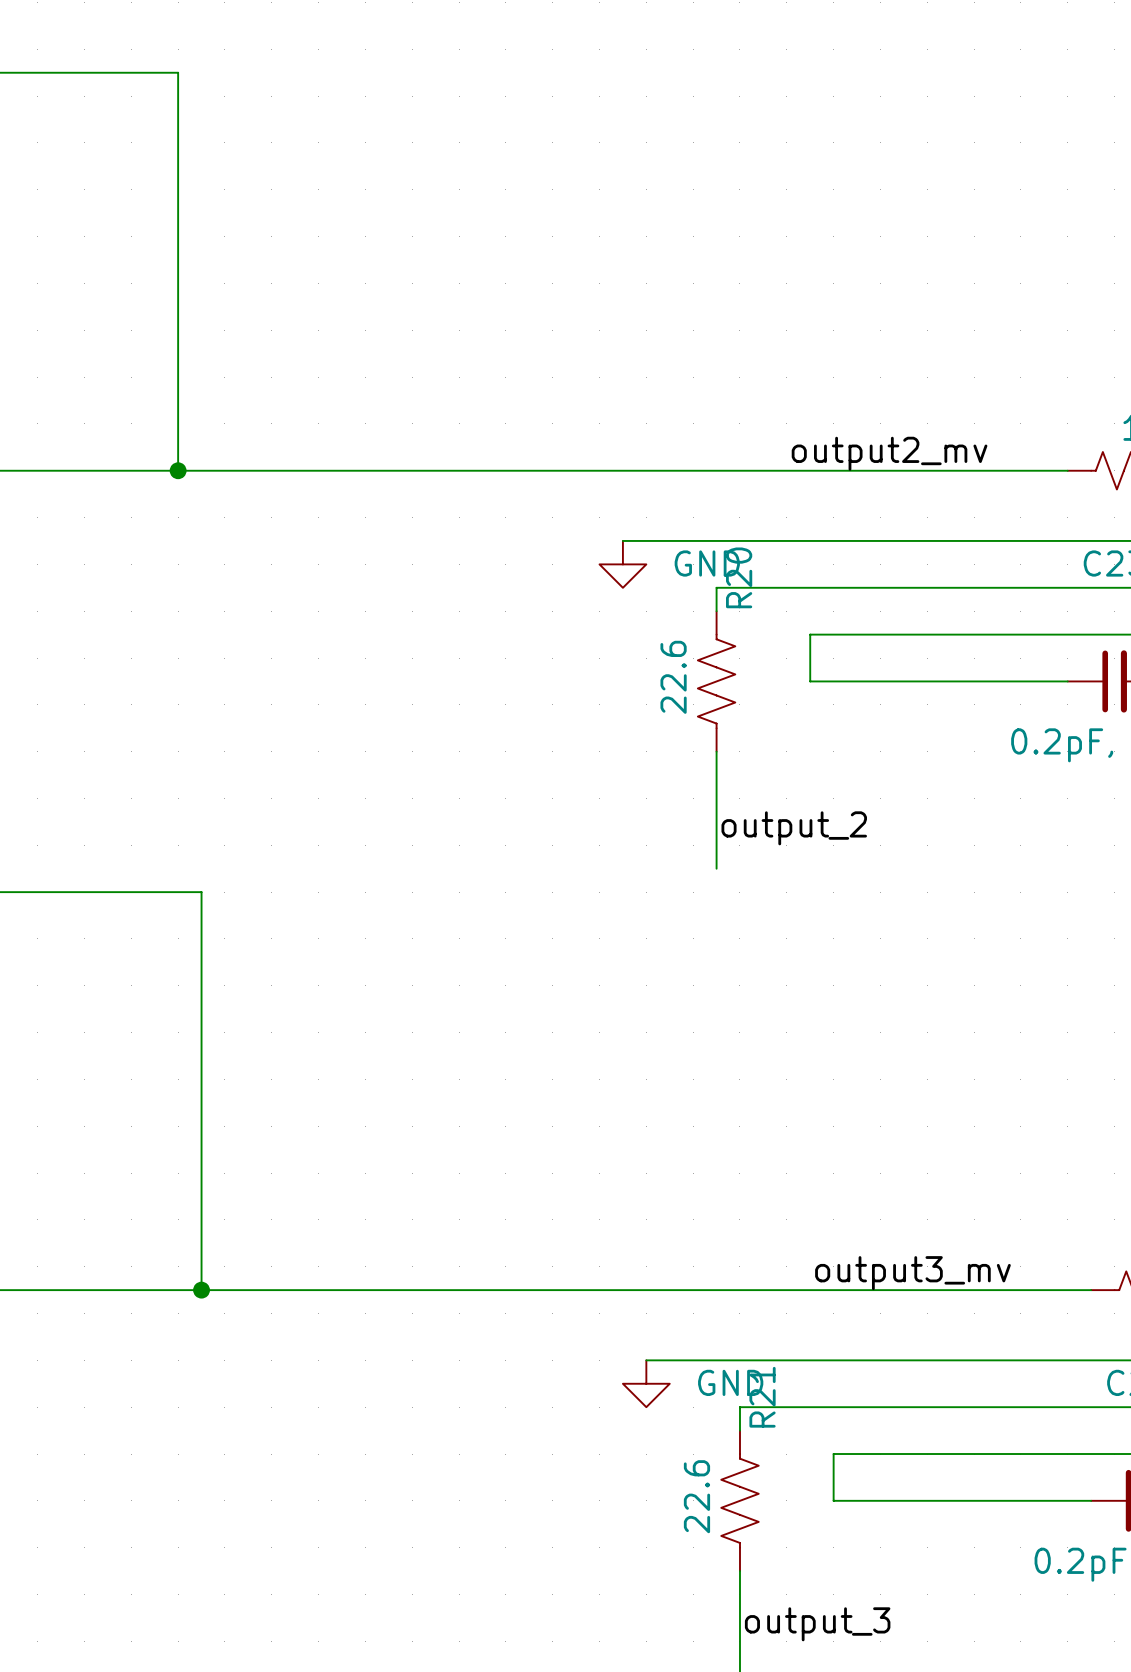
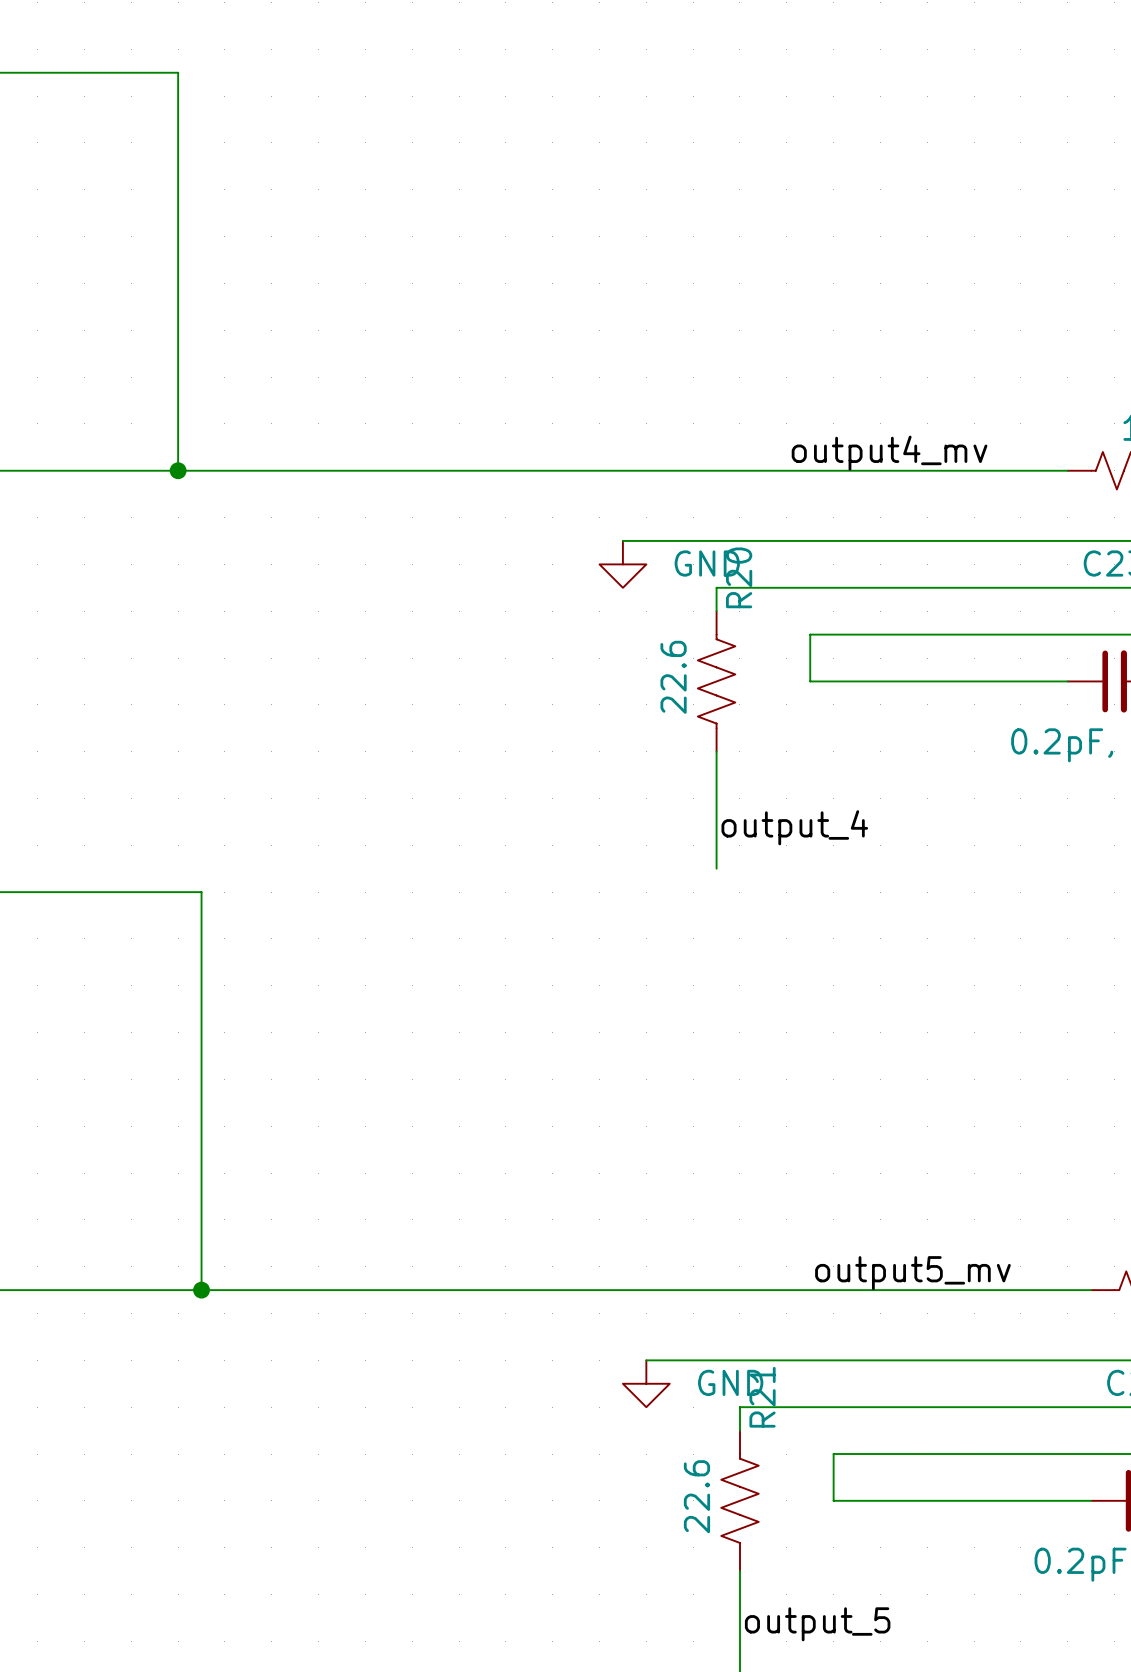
label: output2_mv (889, 453) -> output4_mv (889, 453)
label: output_2 (794, 828) -> output_4 (794, 827)
label: output3_mv (912, 1273) -> output5_mv (912, 1273)
label: output_3 (817, 1624) -> output_5 (817, 1624)

